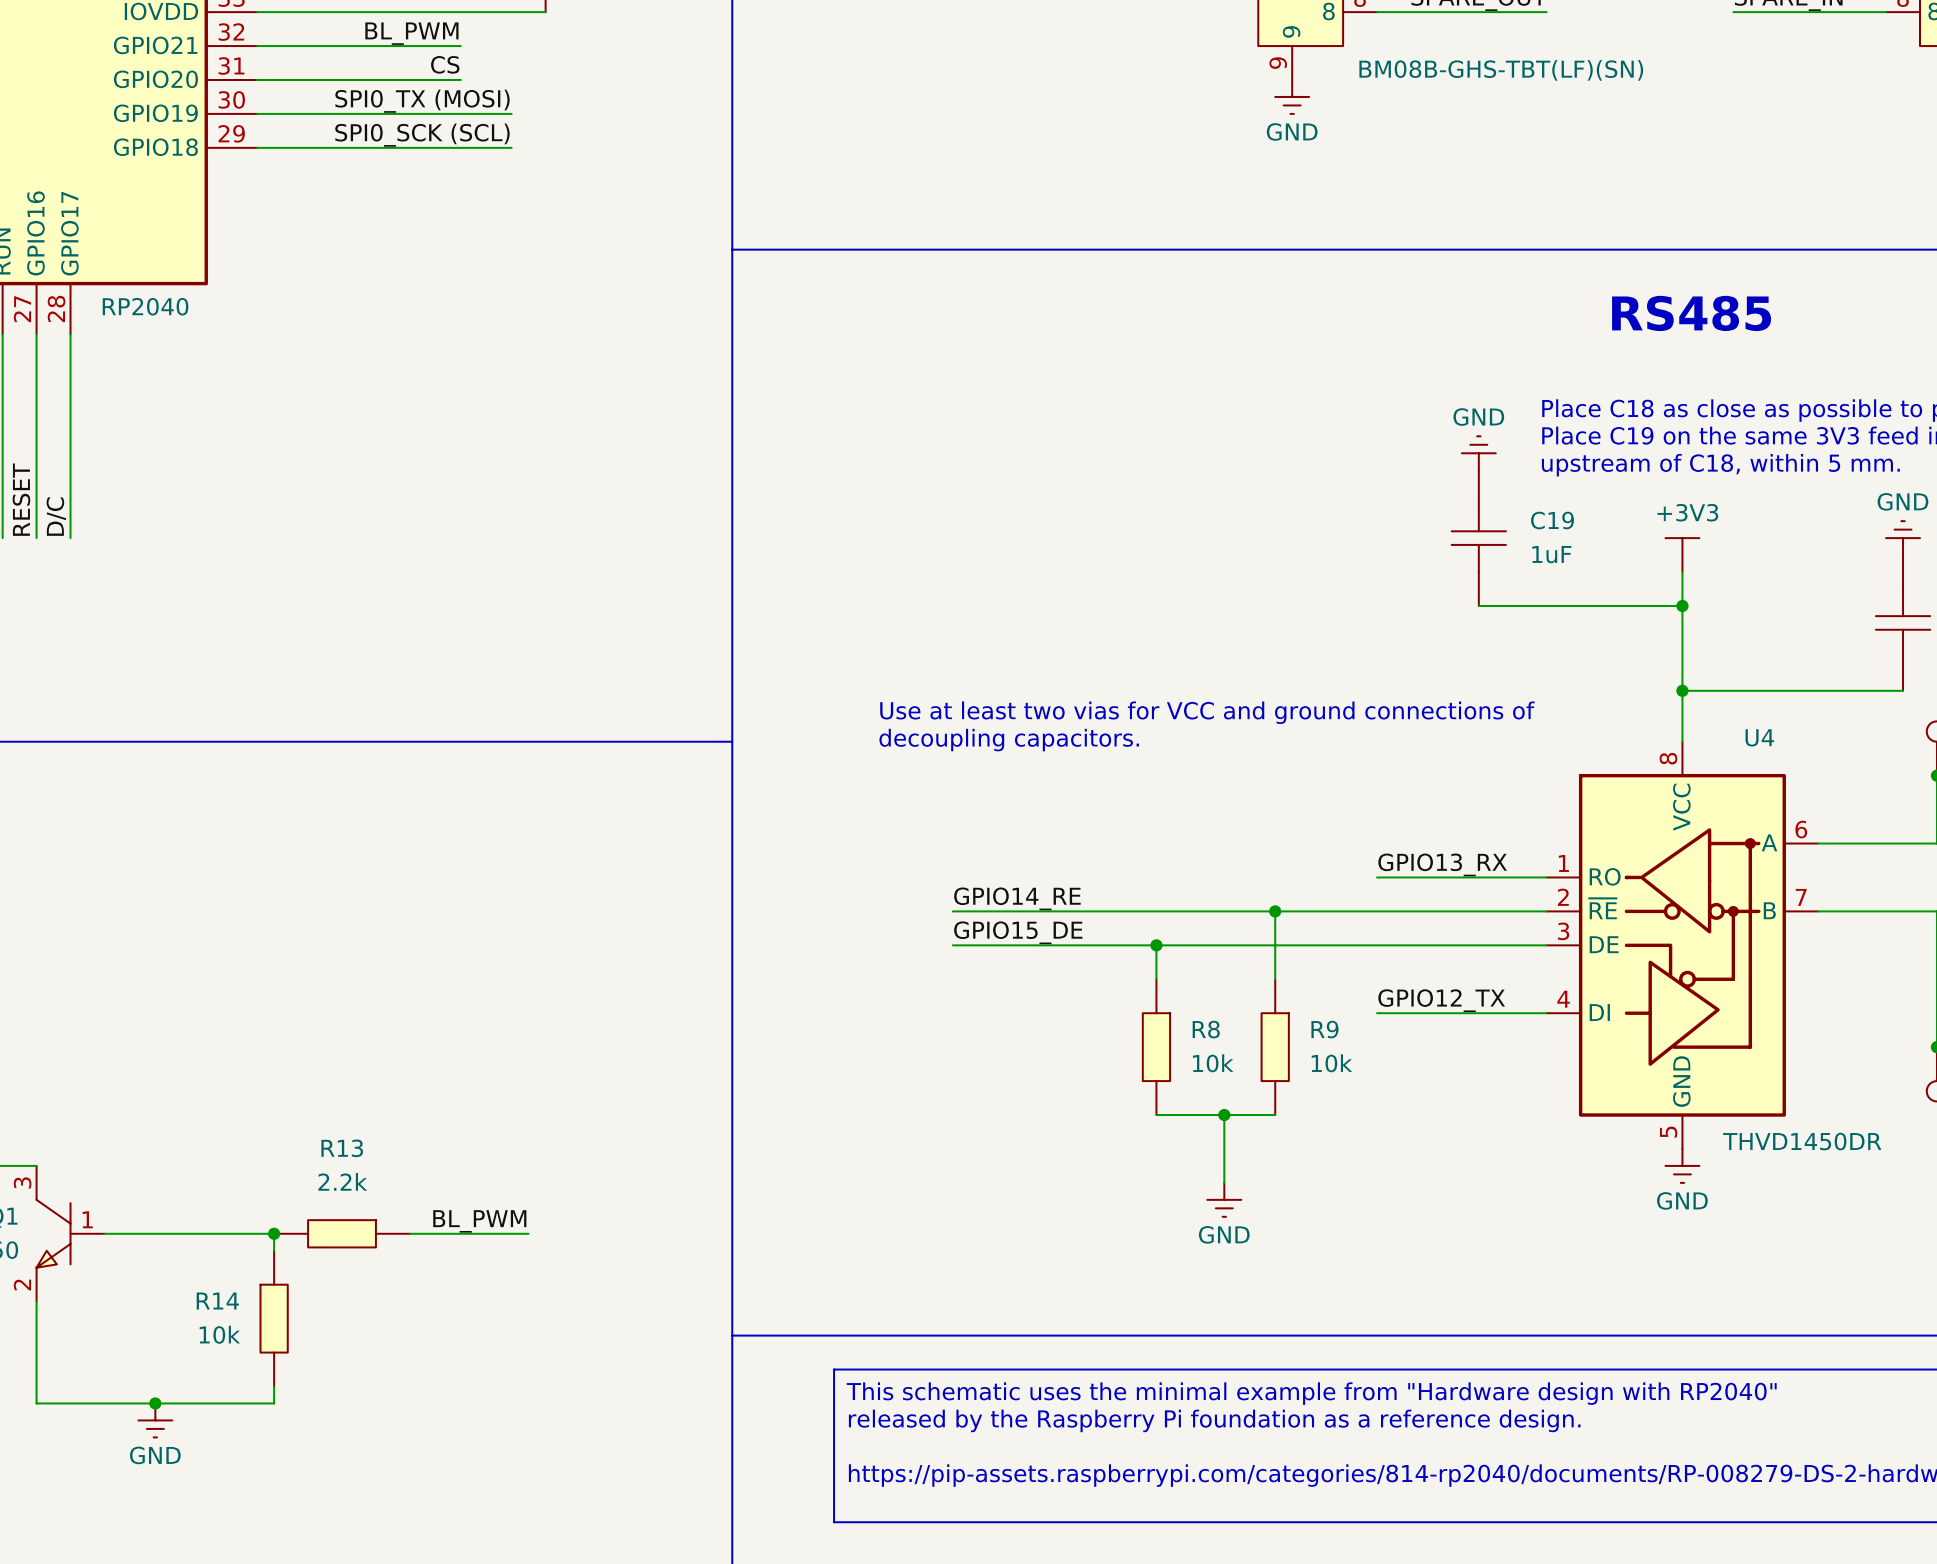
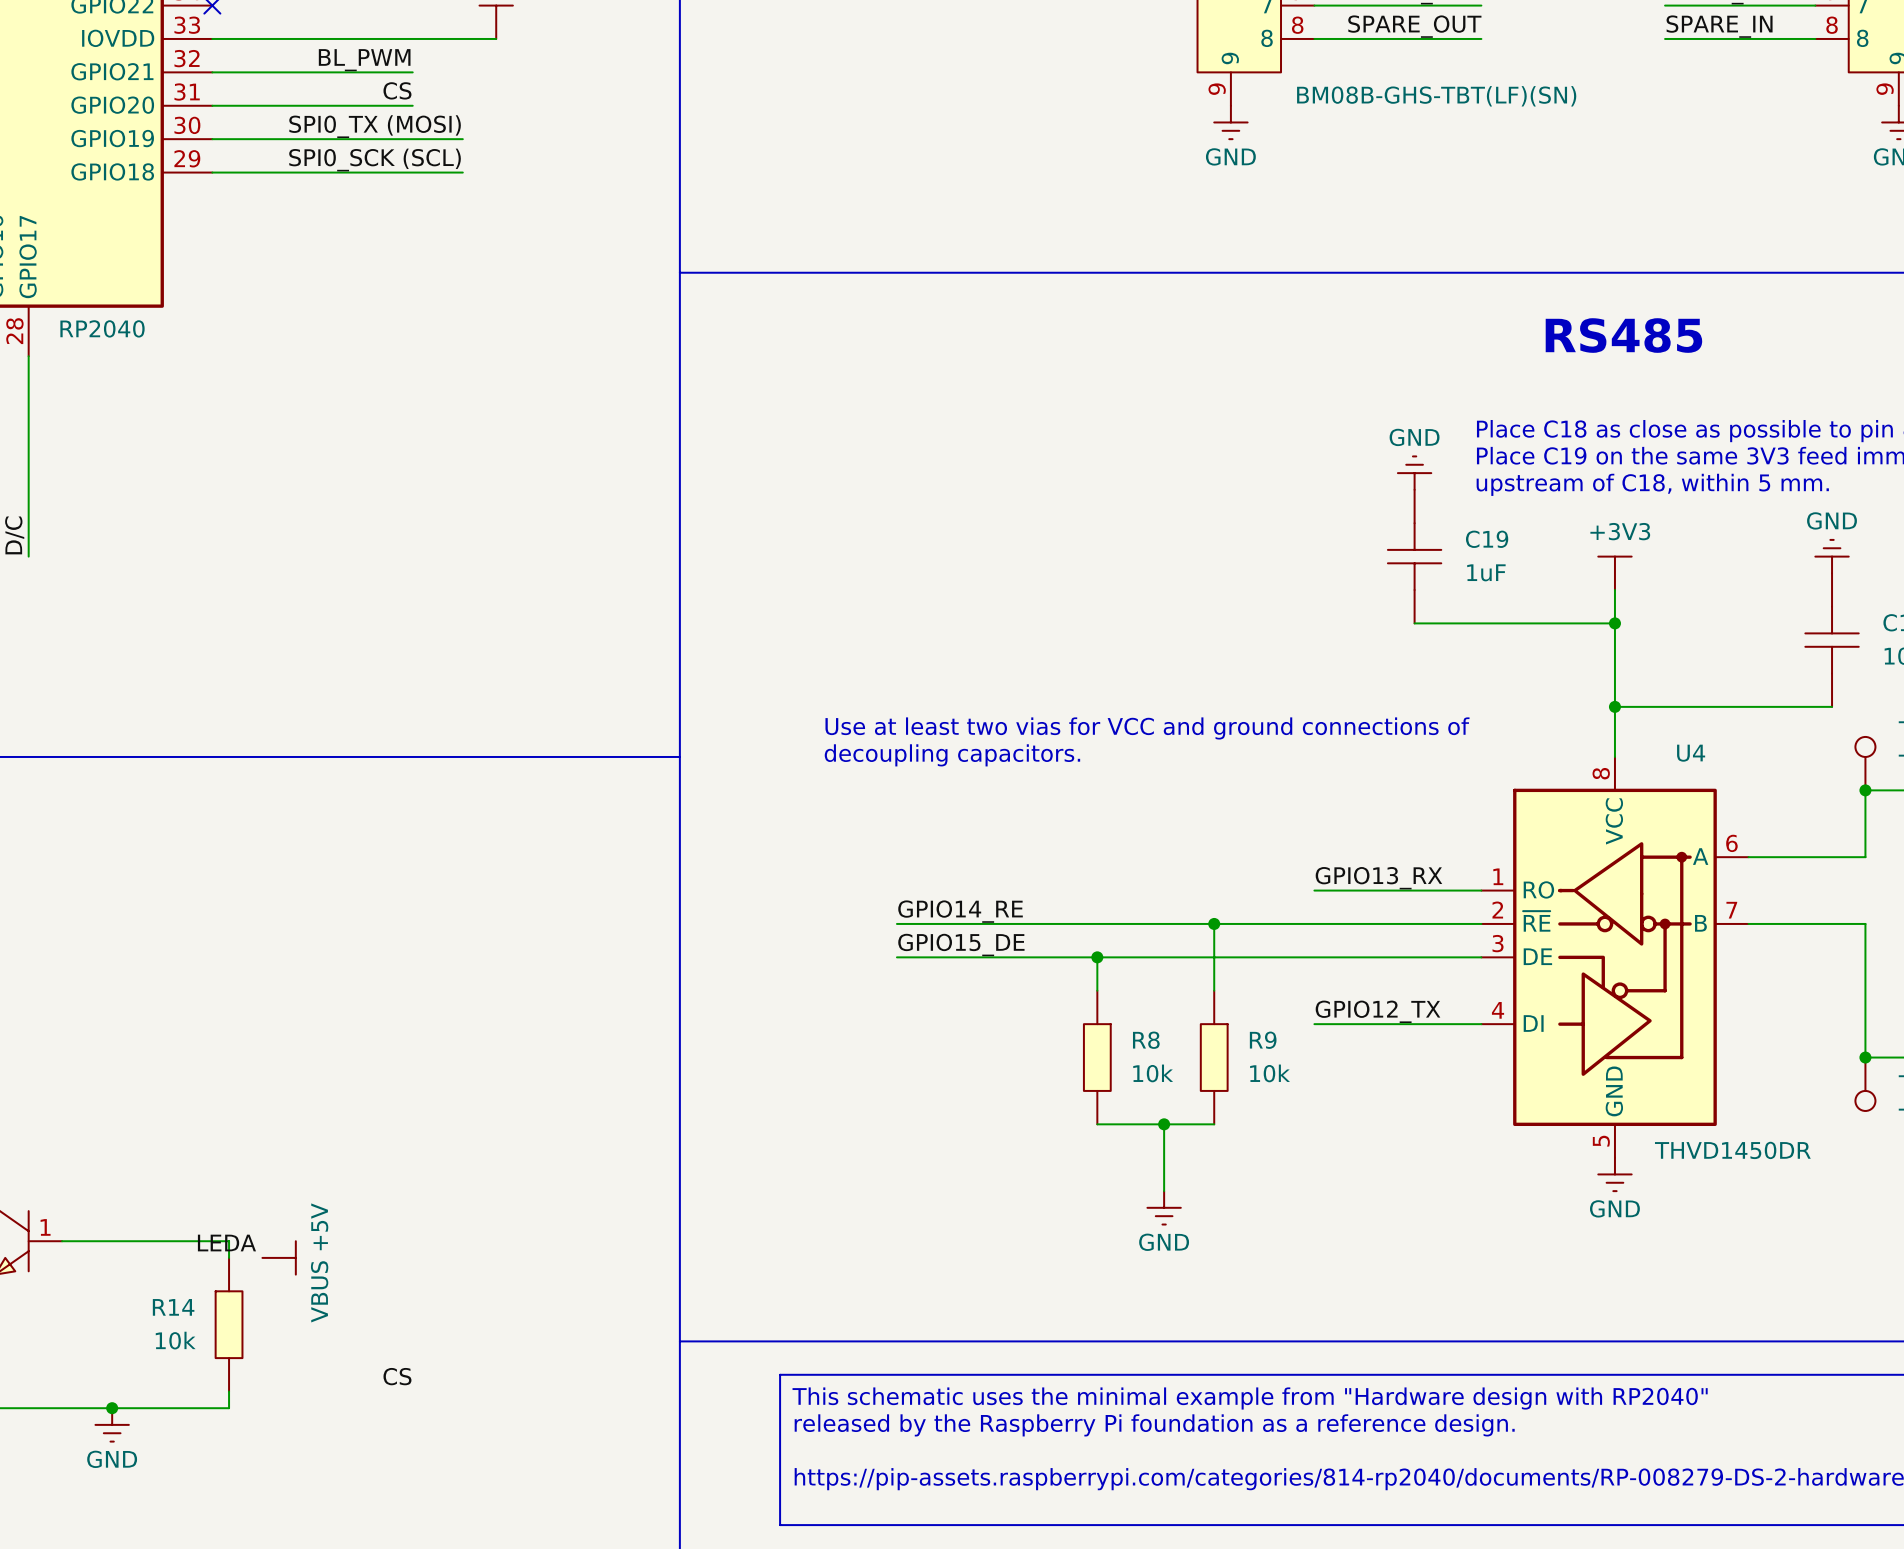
label: BL_PWM (479, 1221) -> none
junction: (274, 1233) -> none
R13: 2.2k (342, 1233) -> none
wire: (409, 1233) (528, 1233) -> none
label: none -> LEDA (226, 1243)
power symbol: none -> VBUS +5V (279, 1257)
label: none -> CS (397, 1376)

